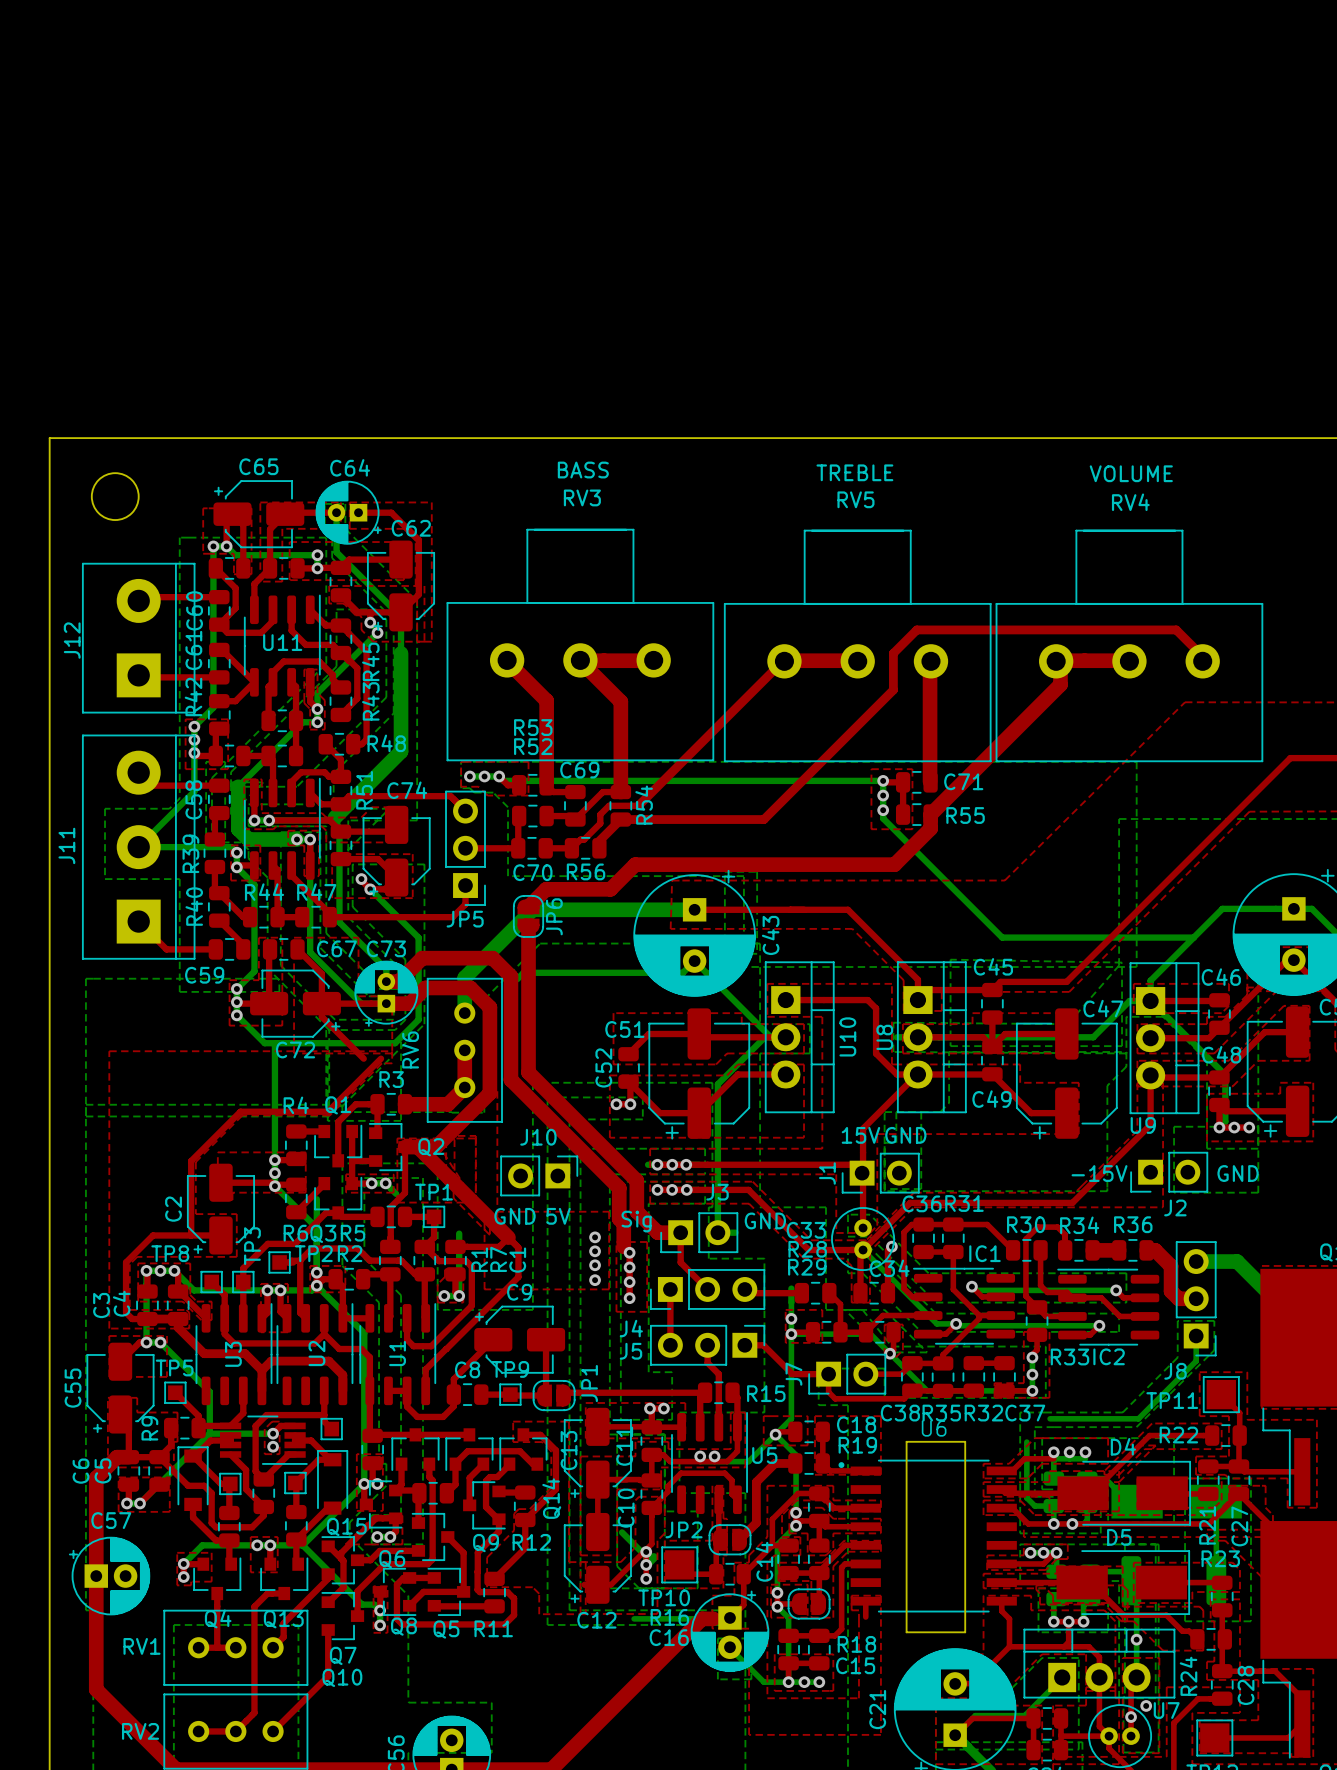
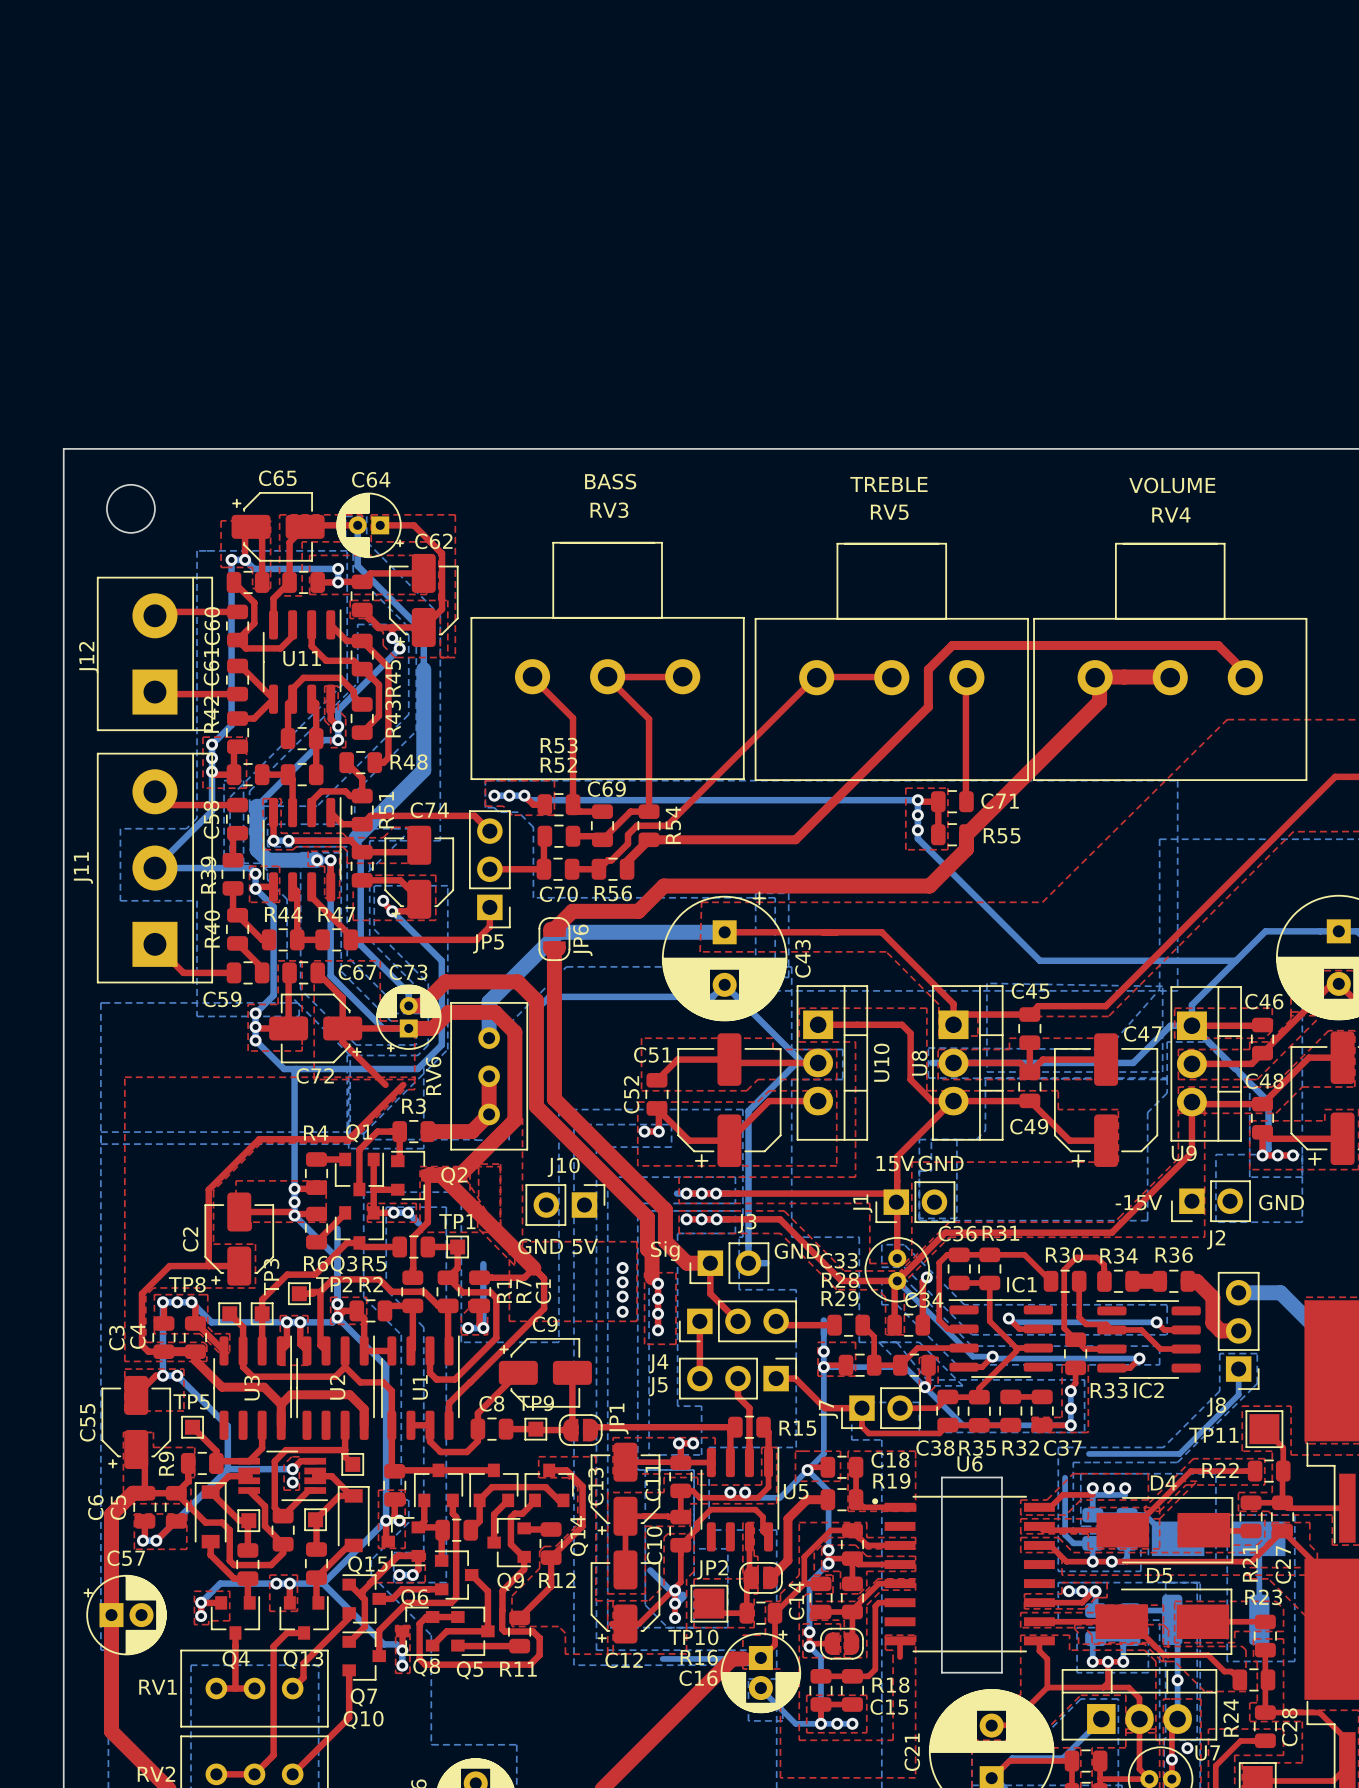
top track width: thick (506, 660) (546, 700) (546, 785) -> thin (531, 677) (573, 718) (573, 804)
top track width: thick (653, 660) (579, 660) (620, 701) (620, 792) -> thin (682, 677) (607, 677) (649, 719) (649, 811)
top track width: thick (856, 660) (783, 660) (638, 805) -> thin (890, 677) (815, 677) (667, 825)
top track width: thick (930, 660) (930, 781) -> thin (965, 677) (965, 801)

